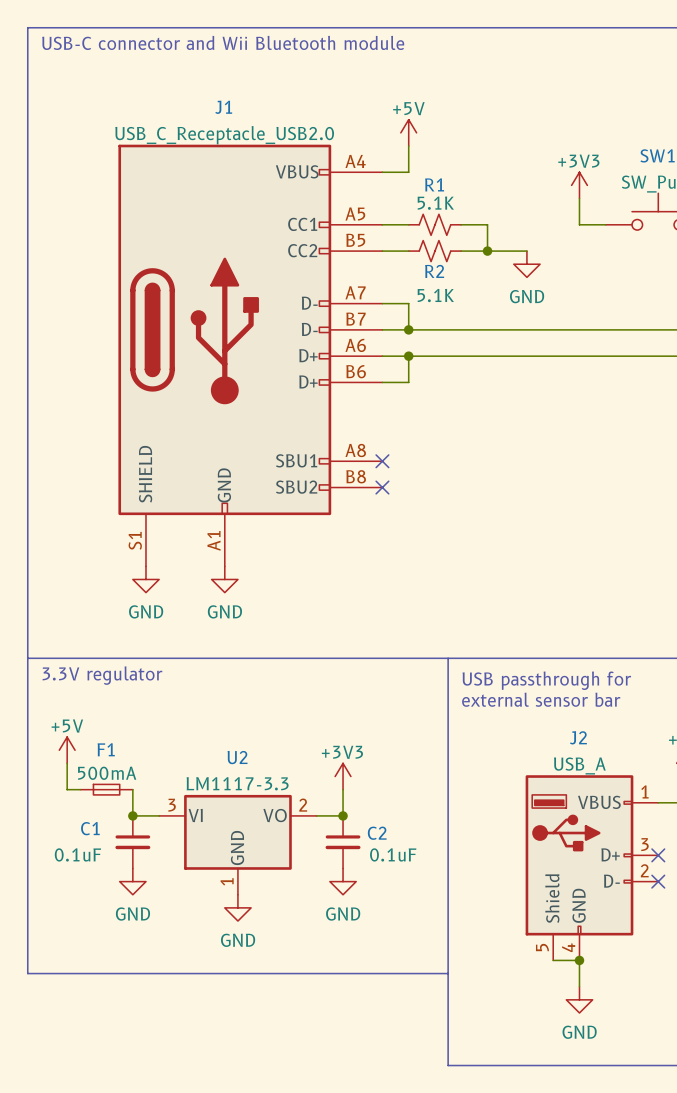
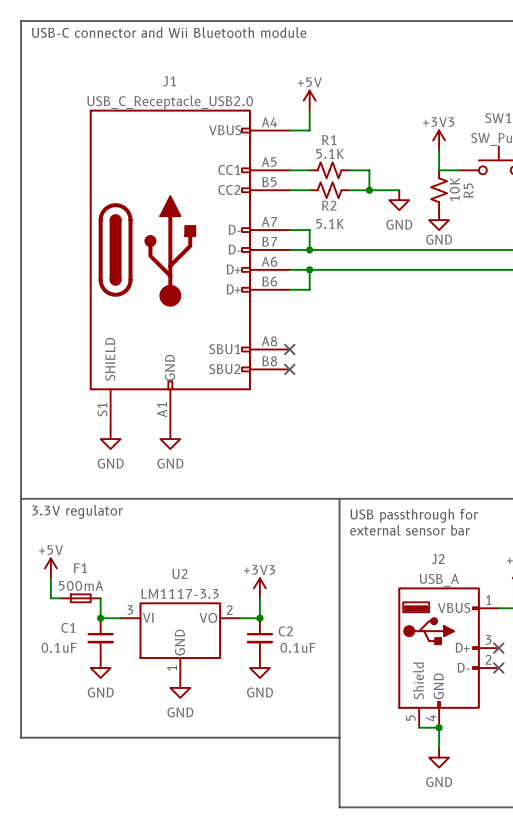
R5: none -> 10K (439, 190)
power symbol: none -> GND (439, 220)

